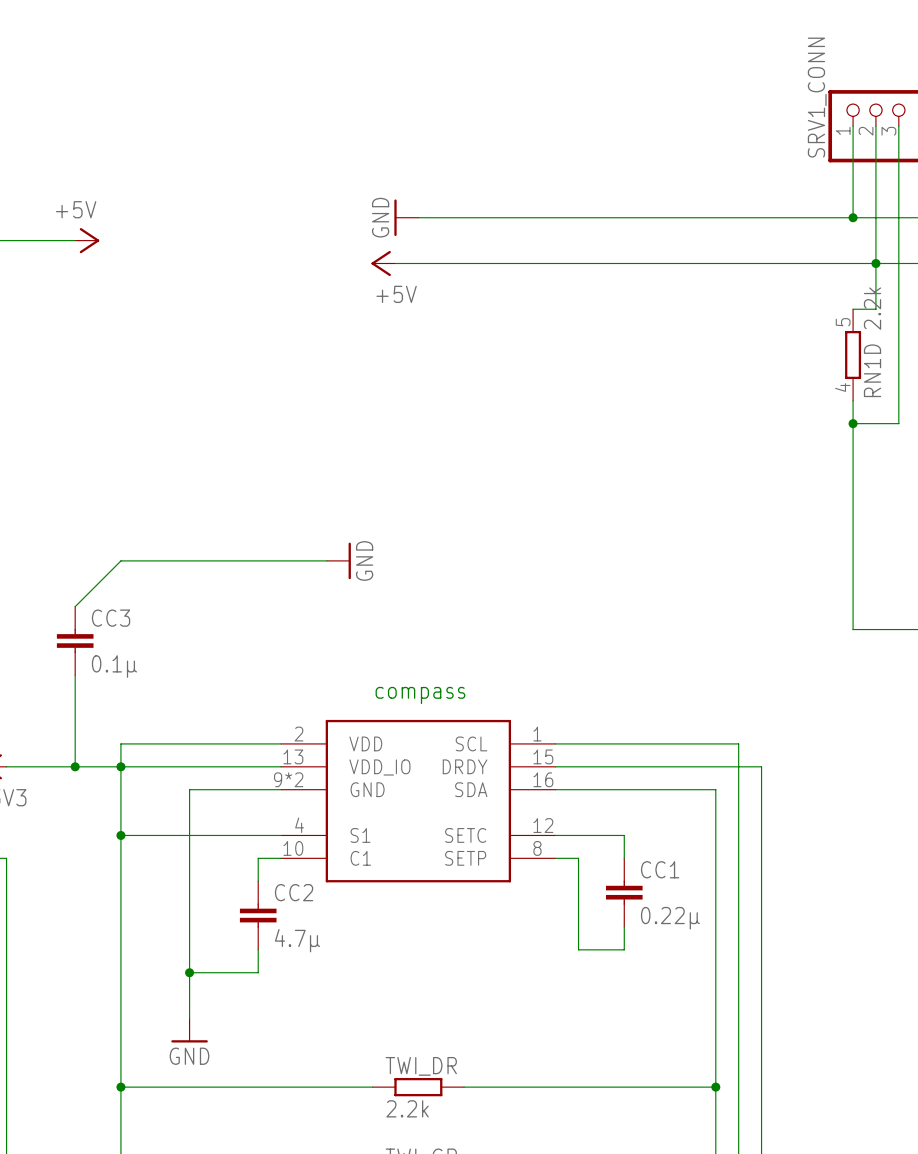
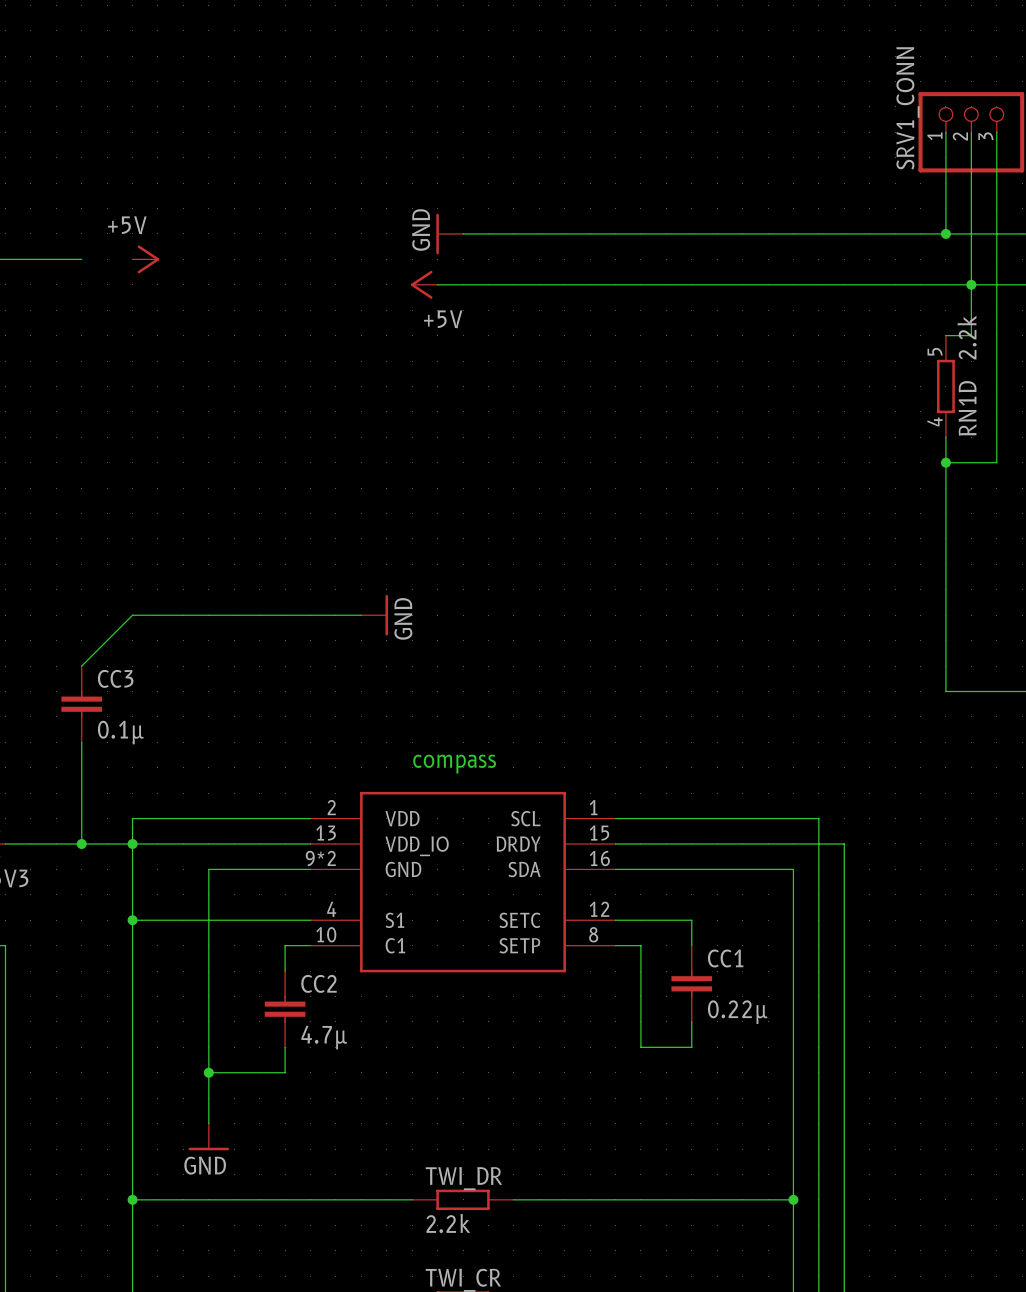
power symbol position: +5V (87, 240) -> +5V (145, 259)

